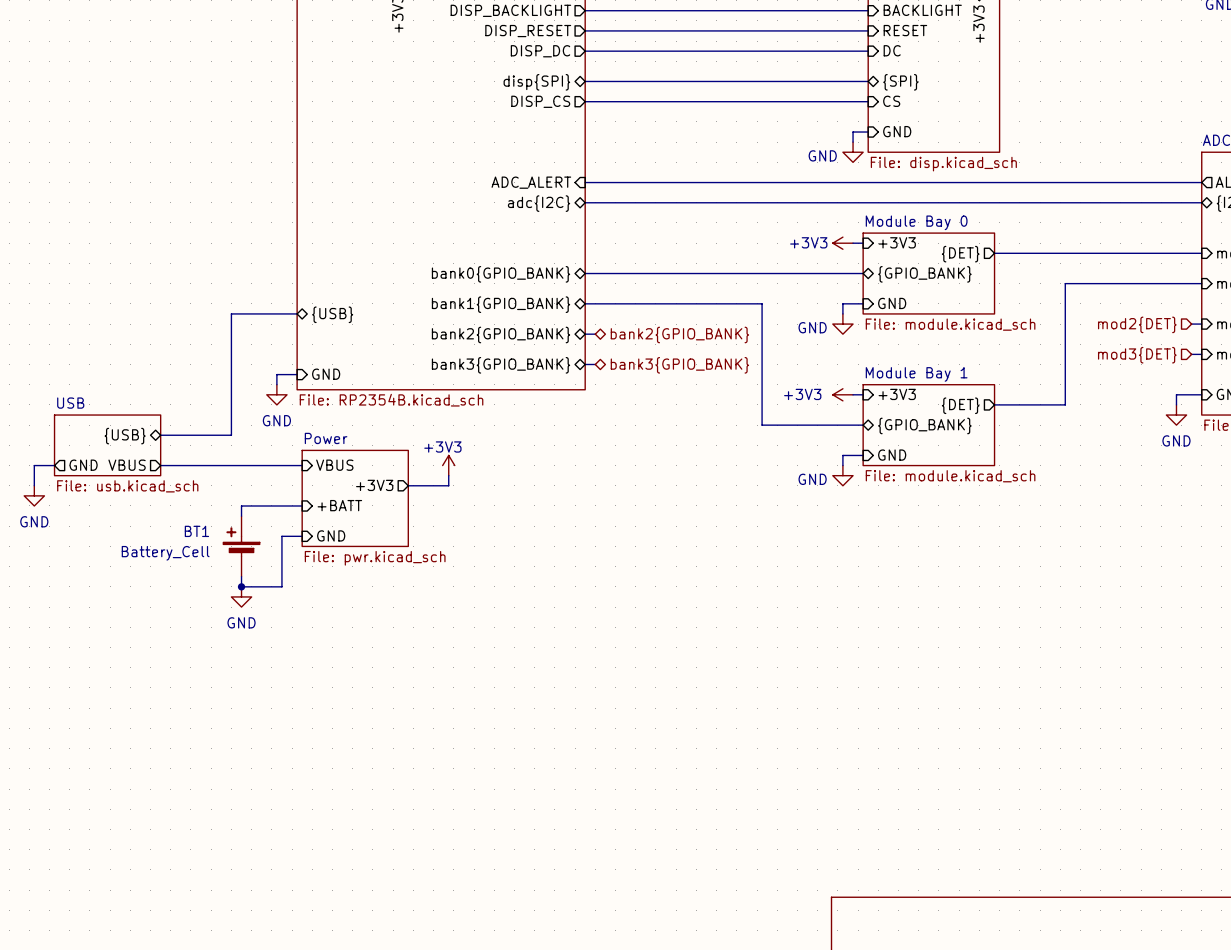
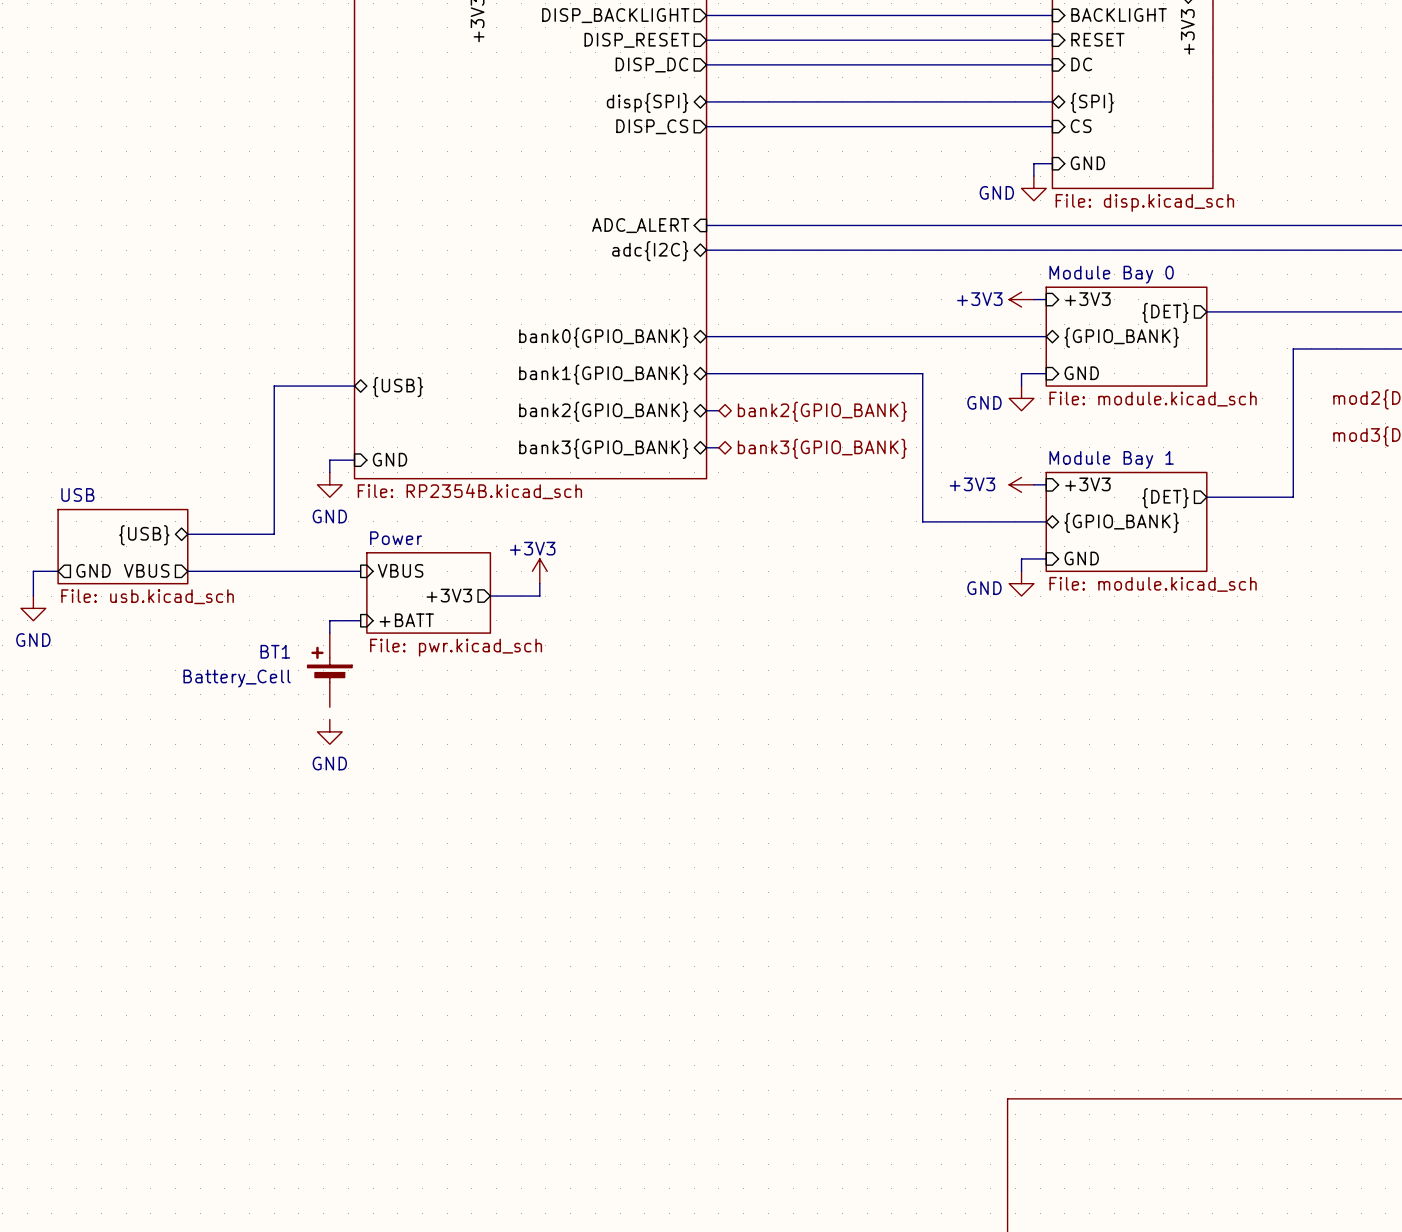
sheet Power: none -> File: pwr.kicad_sch (428, 592)
sheet Power: File: pwr.kicad_sch (355, 498) -> none
wire: (276, 505) (241, 505) (241, 516) -> (329, 620) (329, 633)
sheet pin: GND (331, 535) -> none
wire: (302, 536) (281, 536) (281, 586) (241, 586) (241, 576) -> none
BT1 position: (241, 546) -> (329, 670)
junction: (241, 586) -> none
power symbol position: GND (241, 596) -> GND (329, 731)

